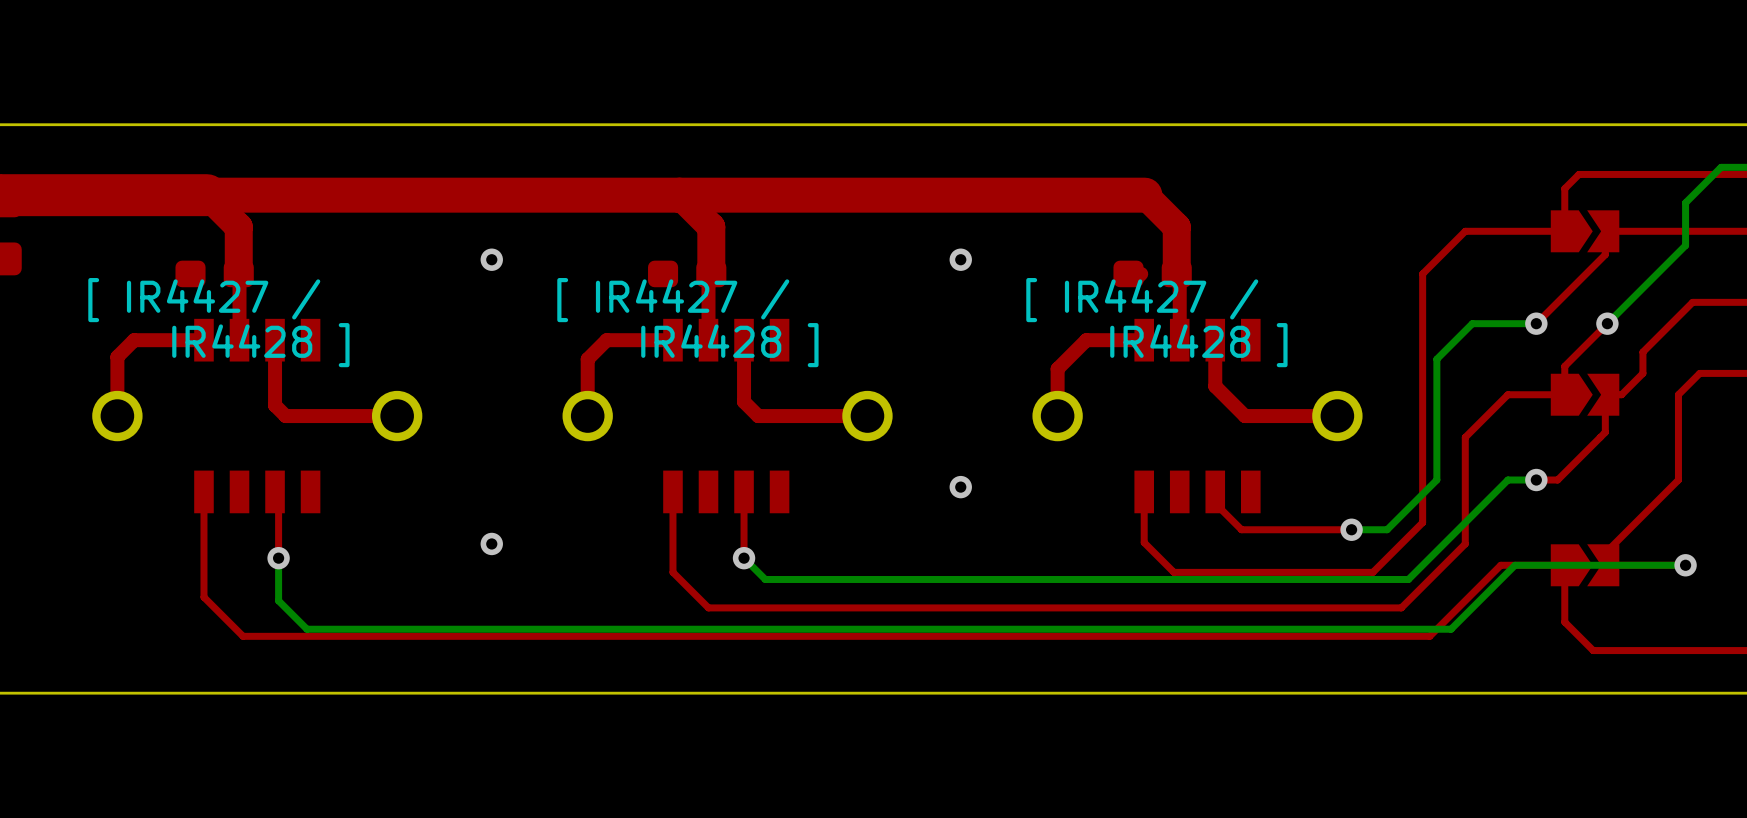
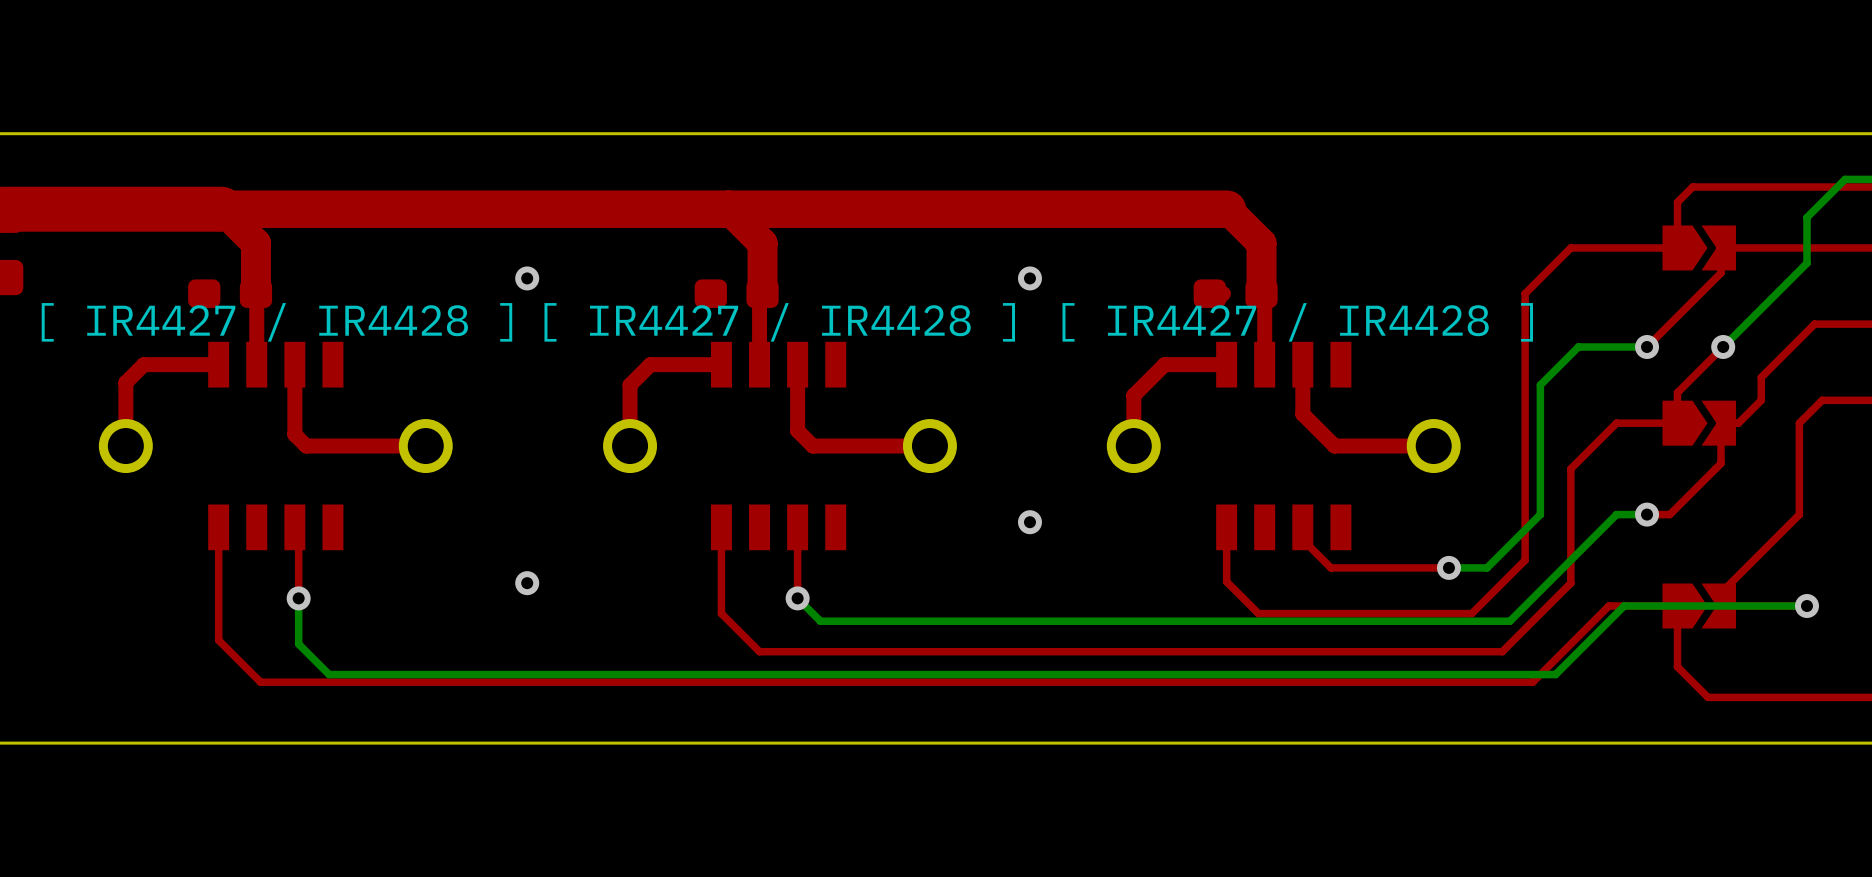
text: [ IR4427 / (204, 300) -> none
text: [ IR4427 / (673, 300) -> none
text: [ IR4427 / (1142, 300) -> none
text: none -> [ IR4427 / IR4428 ] (276, 322)
text: none -> [ IR4427 / IR4428 ] (779, 322)
text: none -> [ IR4427 / IR4428 ] (1297, 322)
text: IR4428 ] (260, 345) -> none
text: IR4428 ] (729, 345) -> none
text: IR4428 ] (1198, 345) -> none

